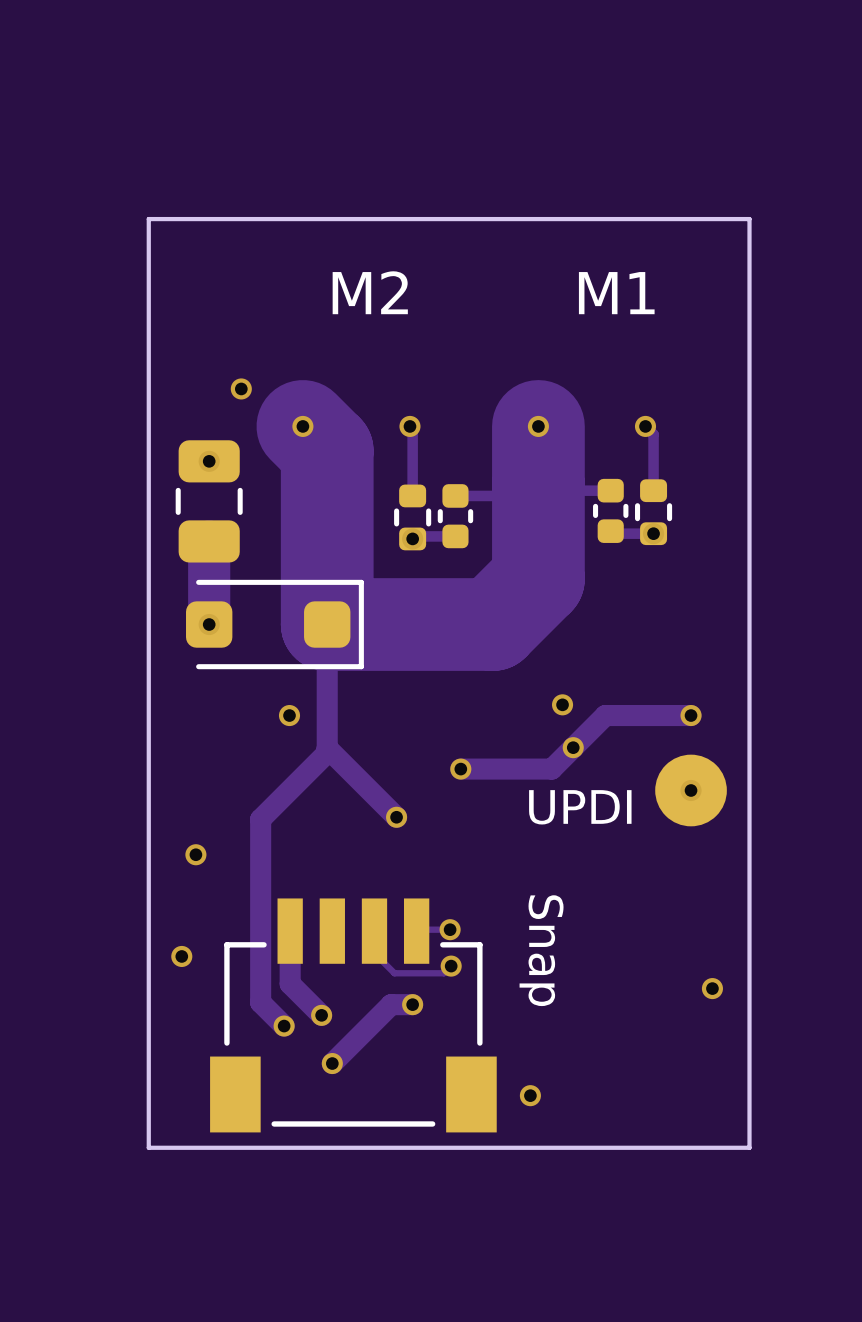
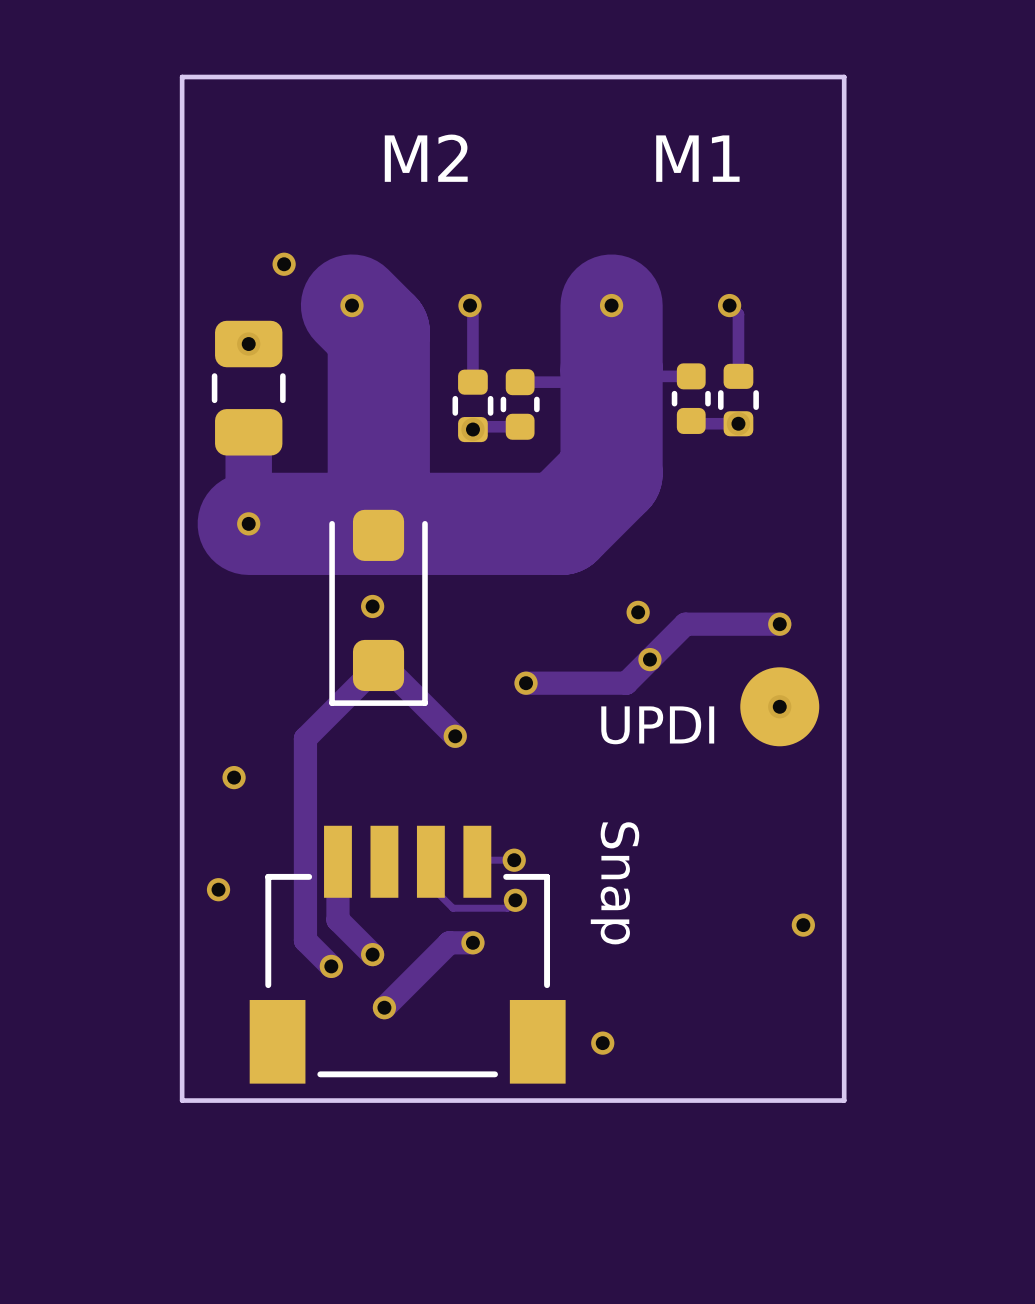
part rotation: 0° (274, 624) -> 90° clockwise (378, 607)
track: (327, 624) (327, 747) -> (378, 523) (248, 523)
via position: (289, 715) -> (372, 606)

